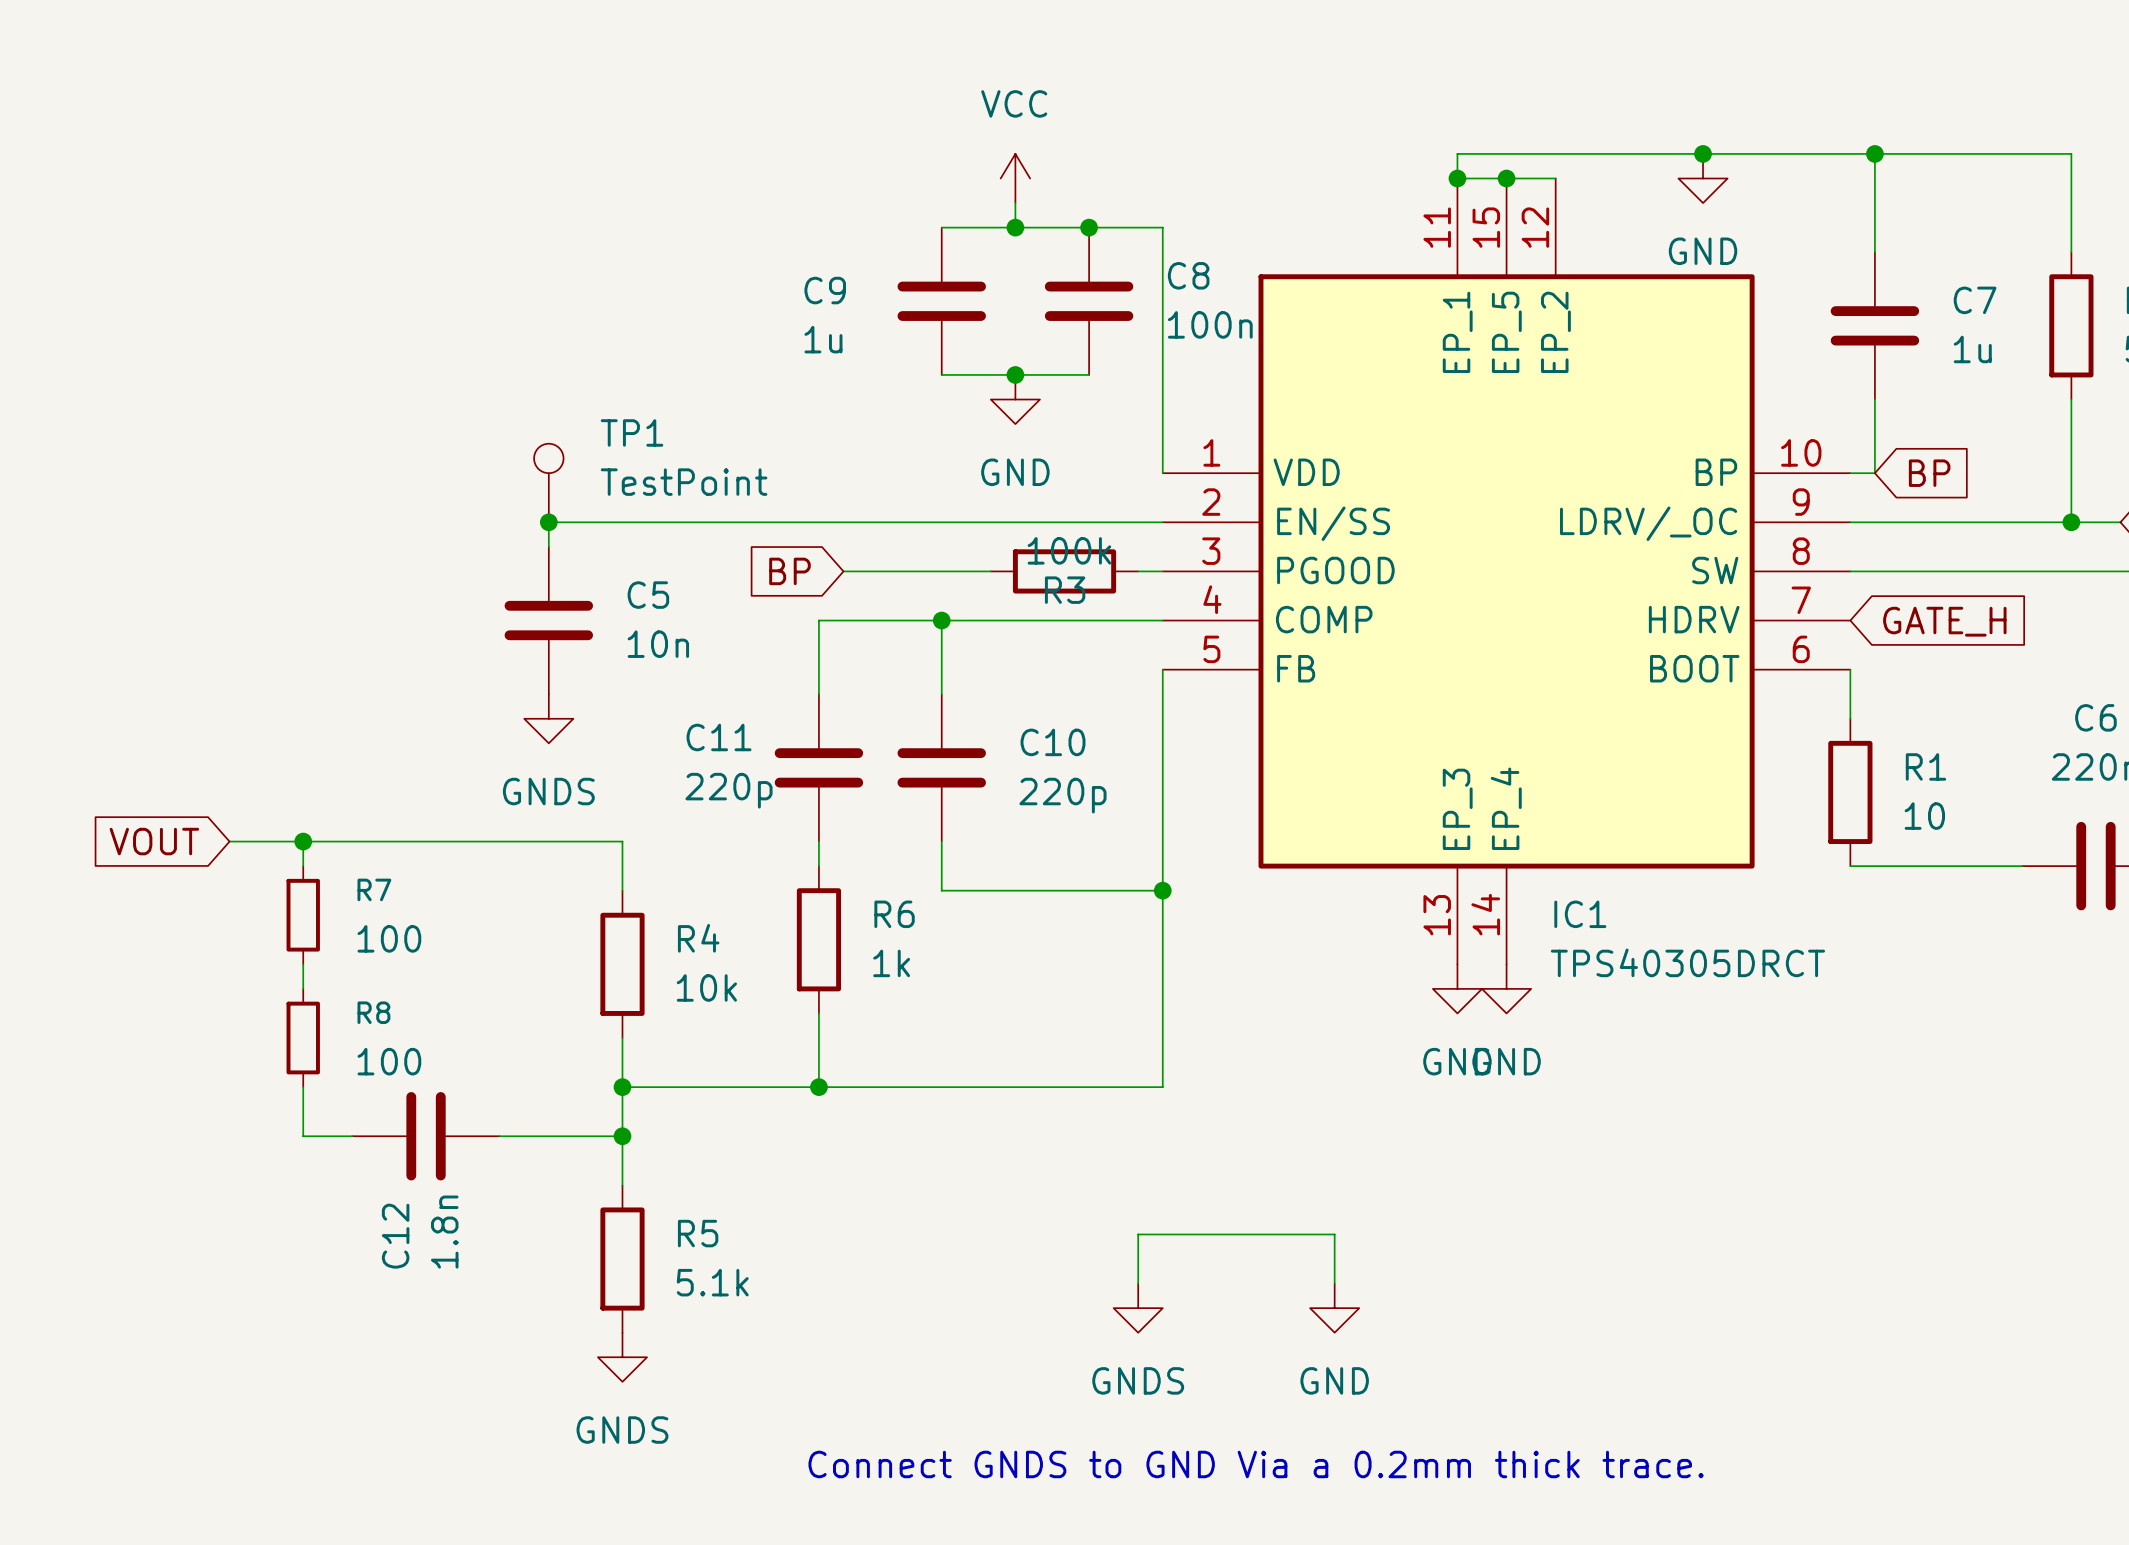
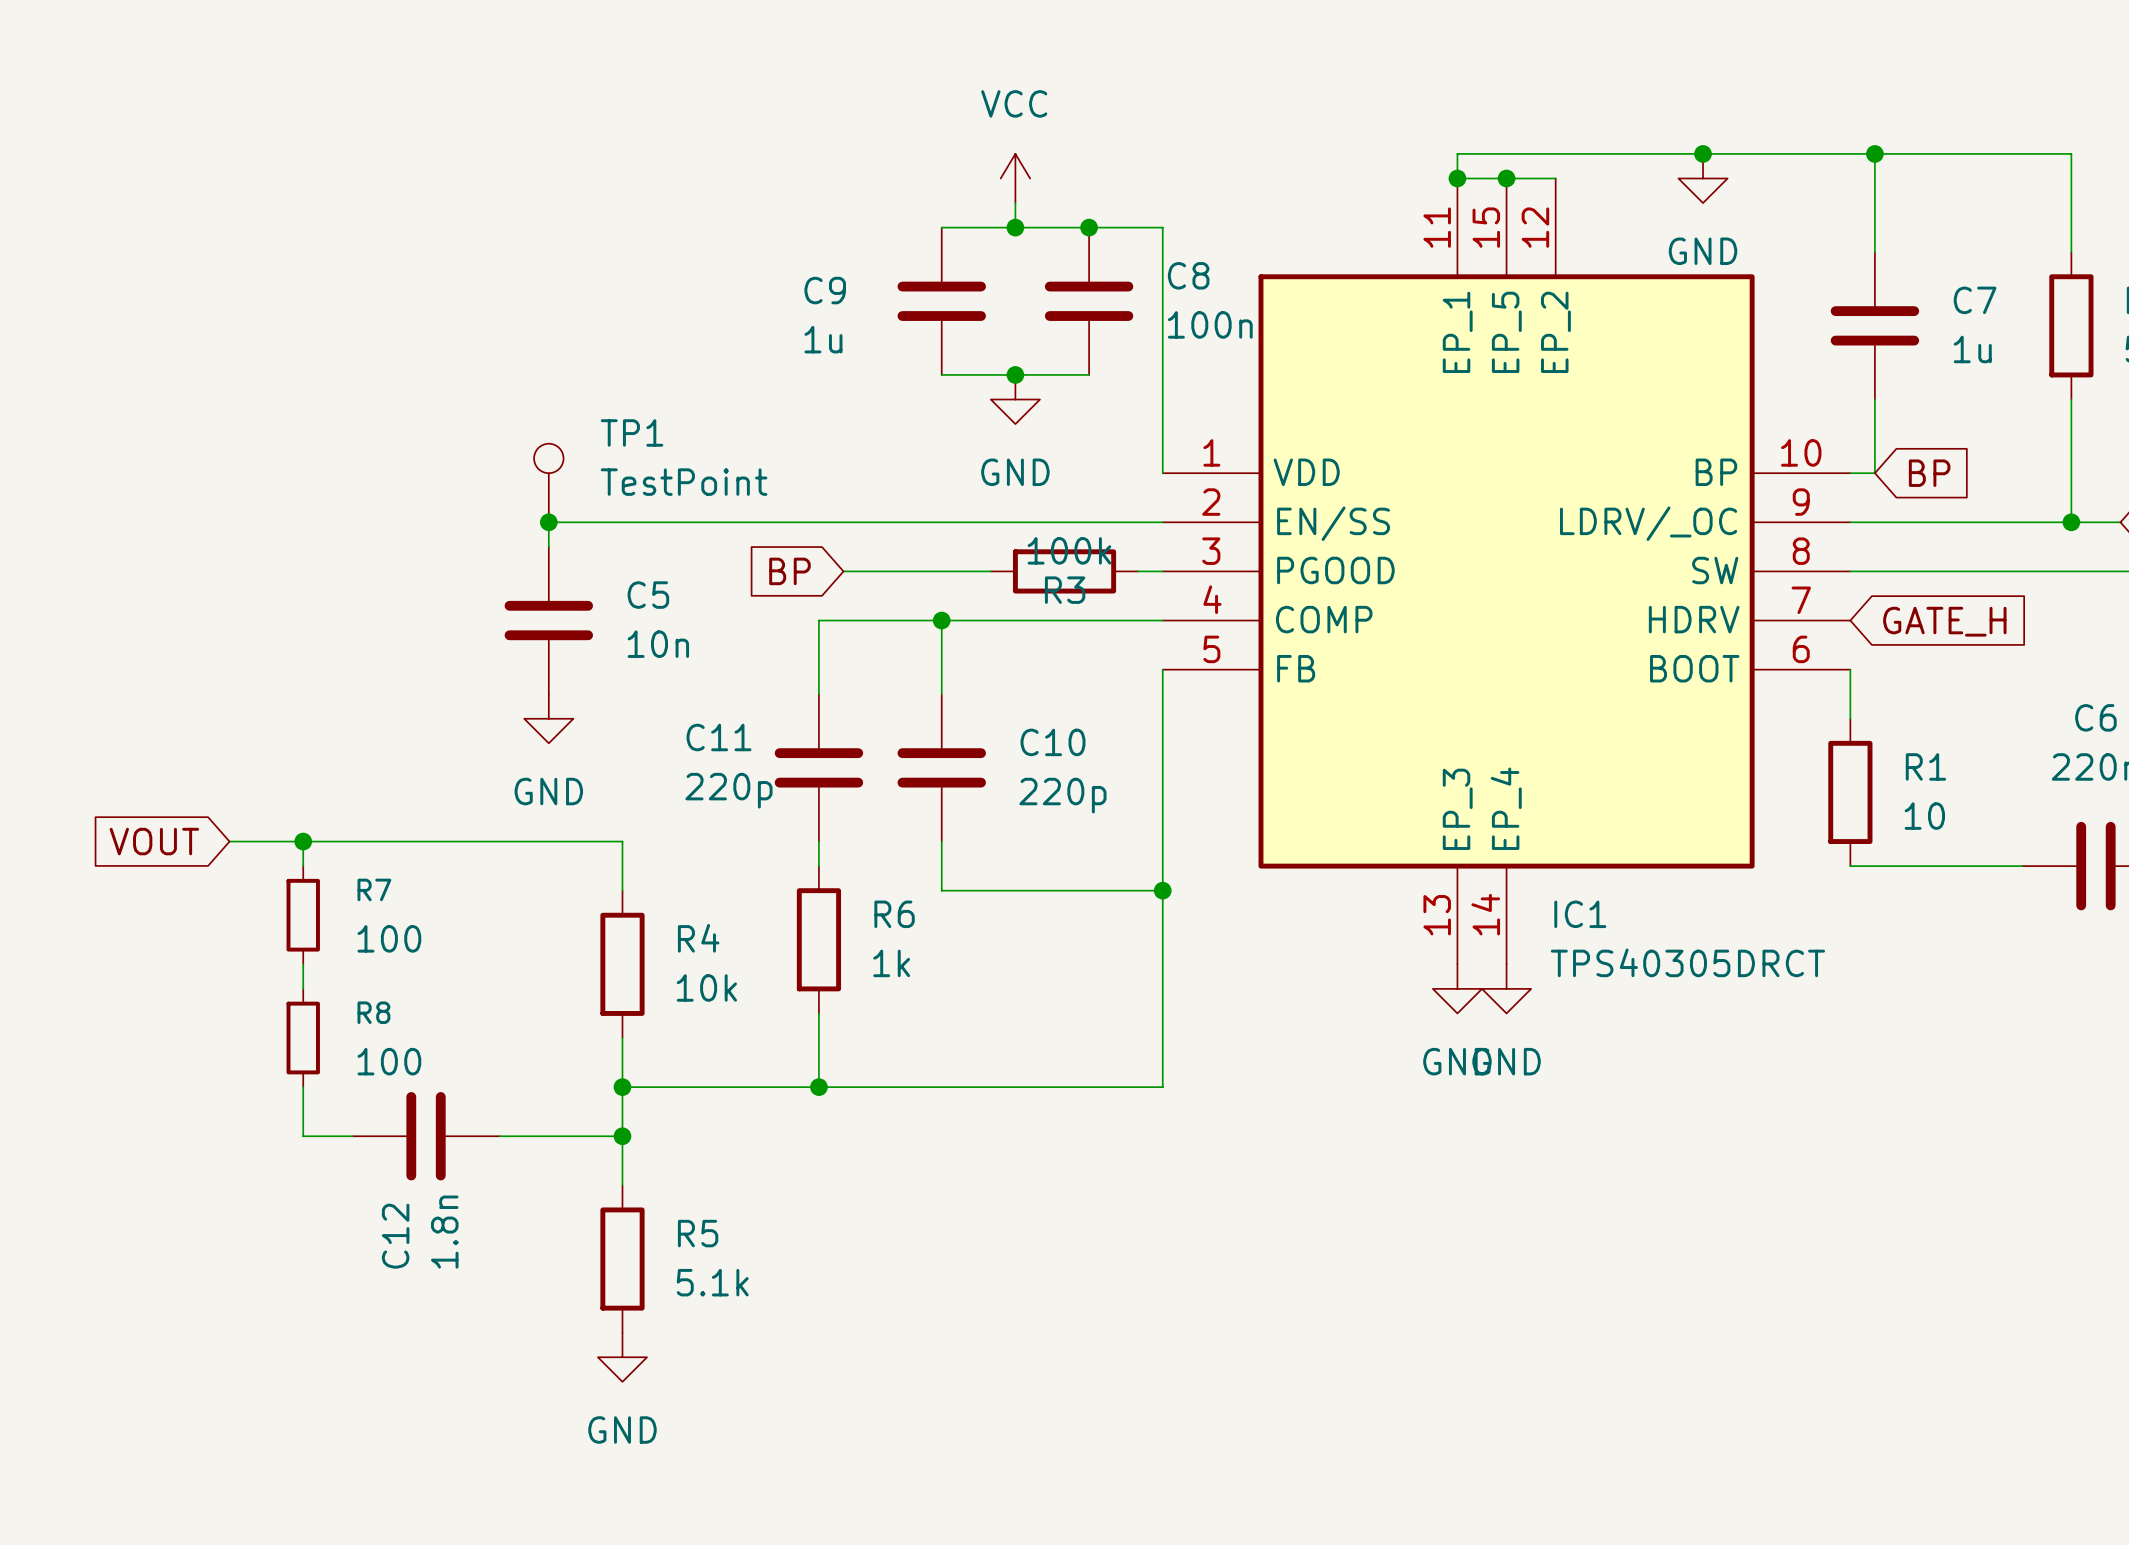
power symbol: GNDS (548, 718) -> GND (548, 718)
wire: (1138, 1283) (1138, 1234) (1334, 1234) (1334, 1283) -> none
power symbol: GNDS (1138, 1308) -> none
power symbol: GND (1334, 1308) -> none
power symbol: GNDS (622, 1357) -> GND (622, 1357)
text: Connect GNDS to GND Via a 0.2mm thick trace. (1256, 1464) -> none

